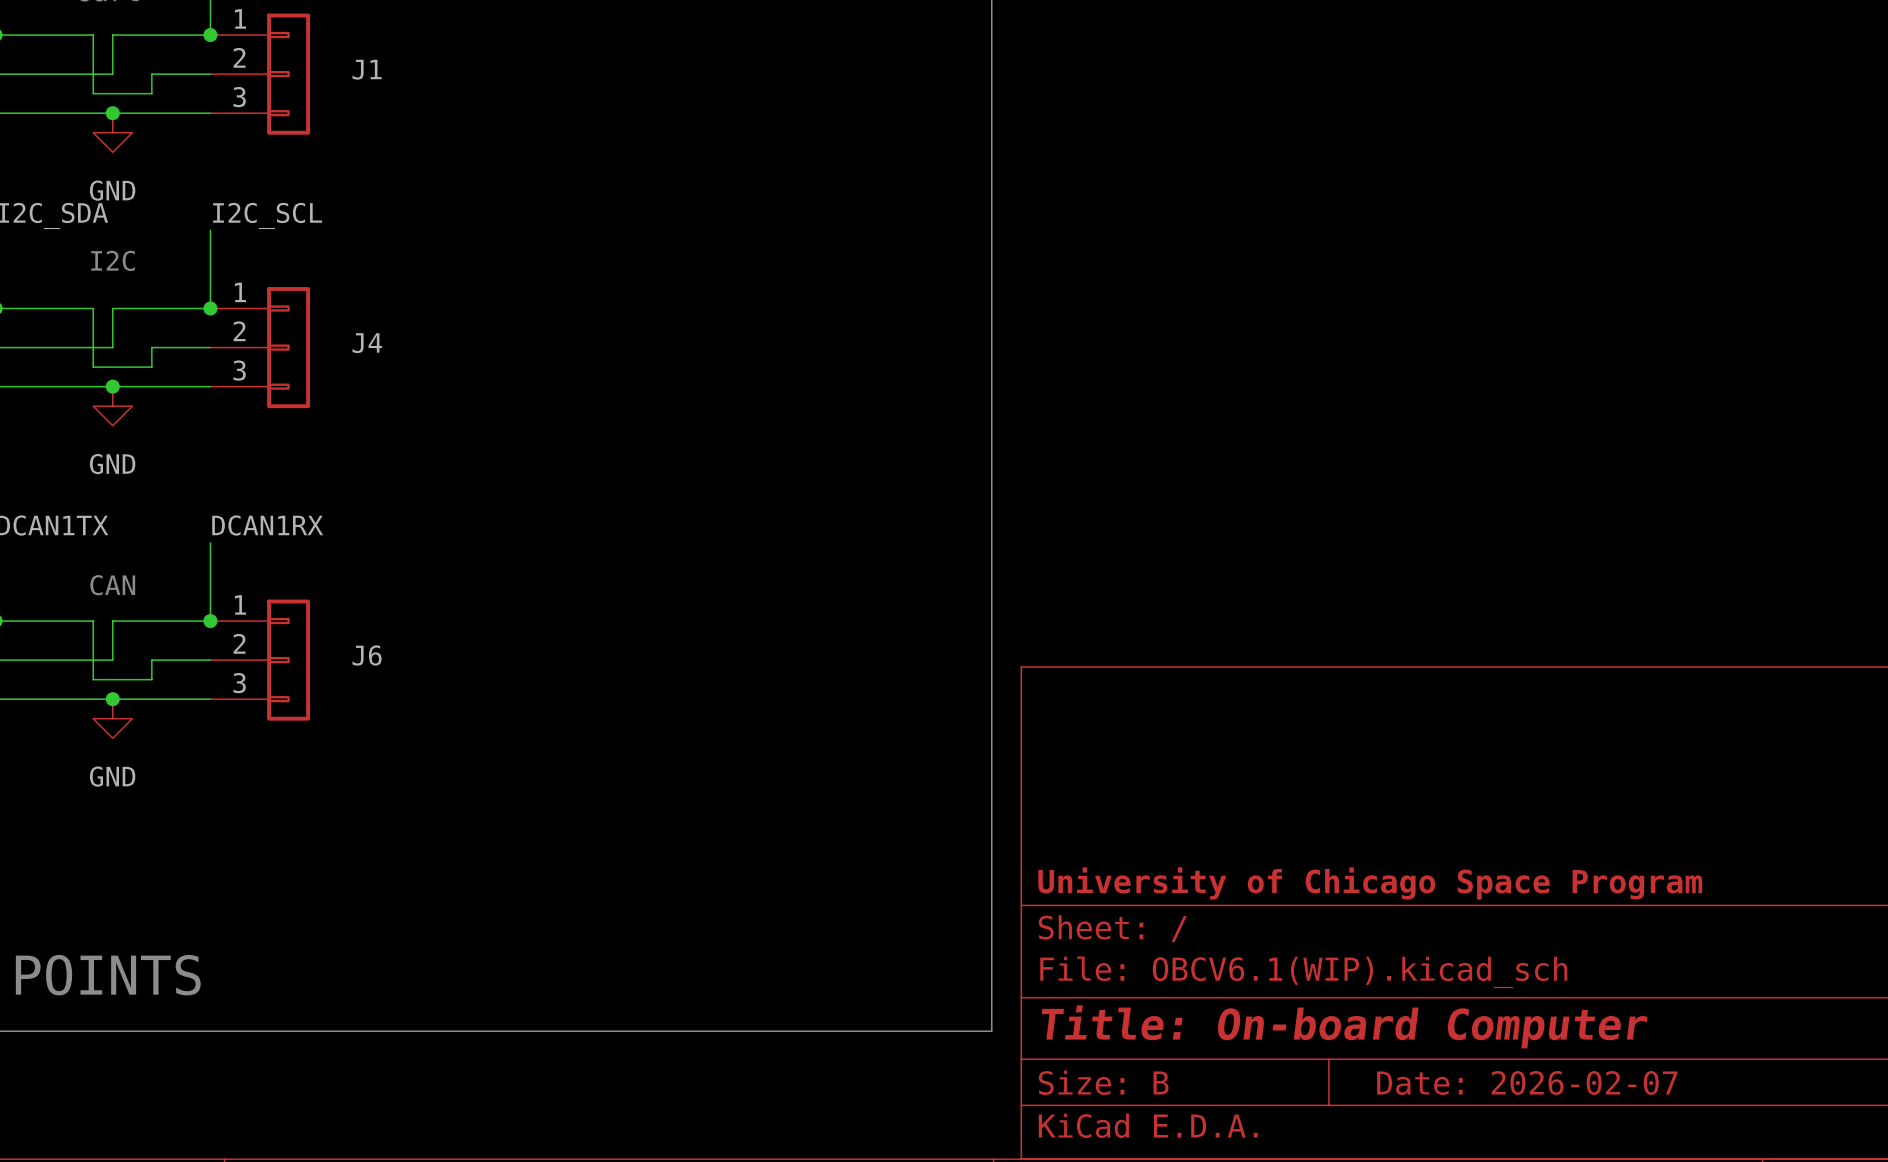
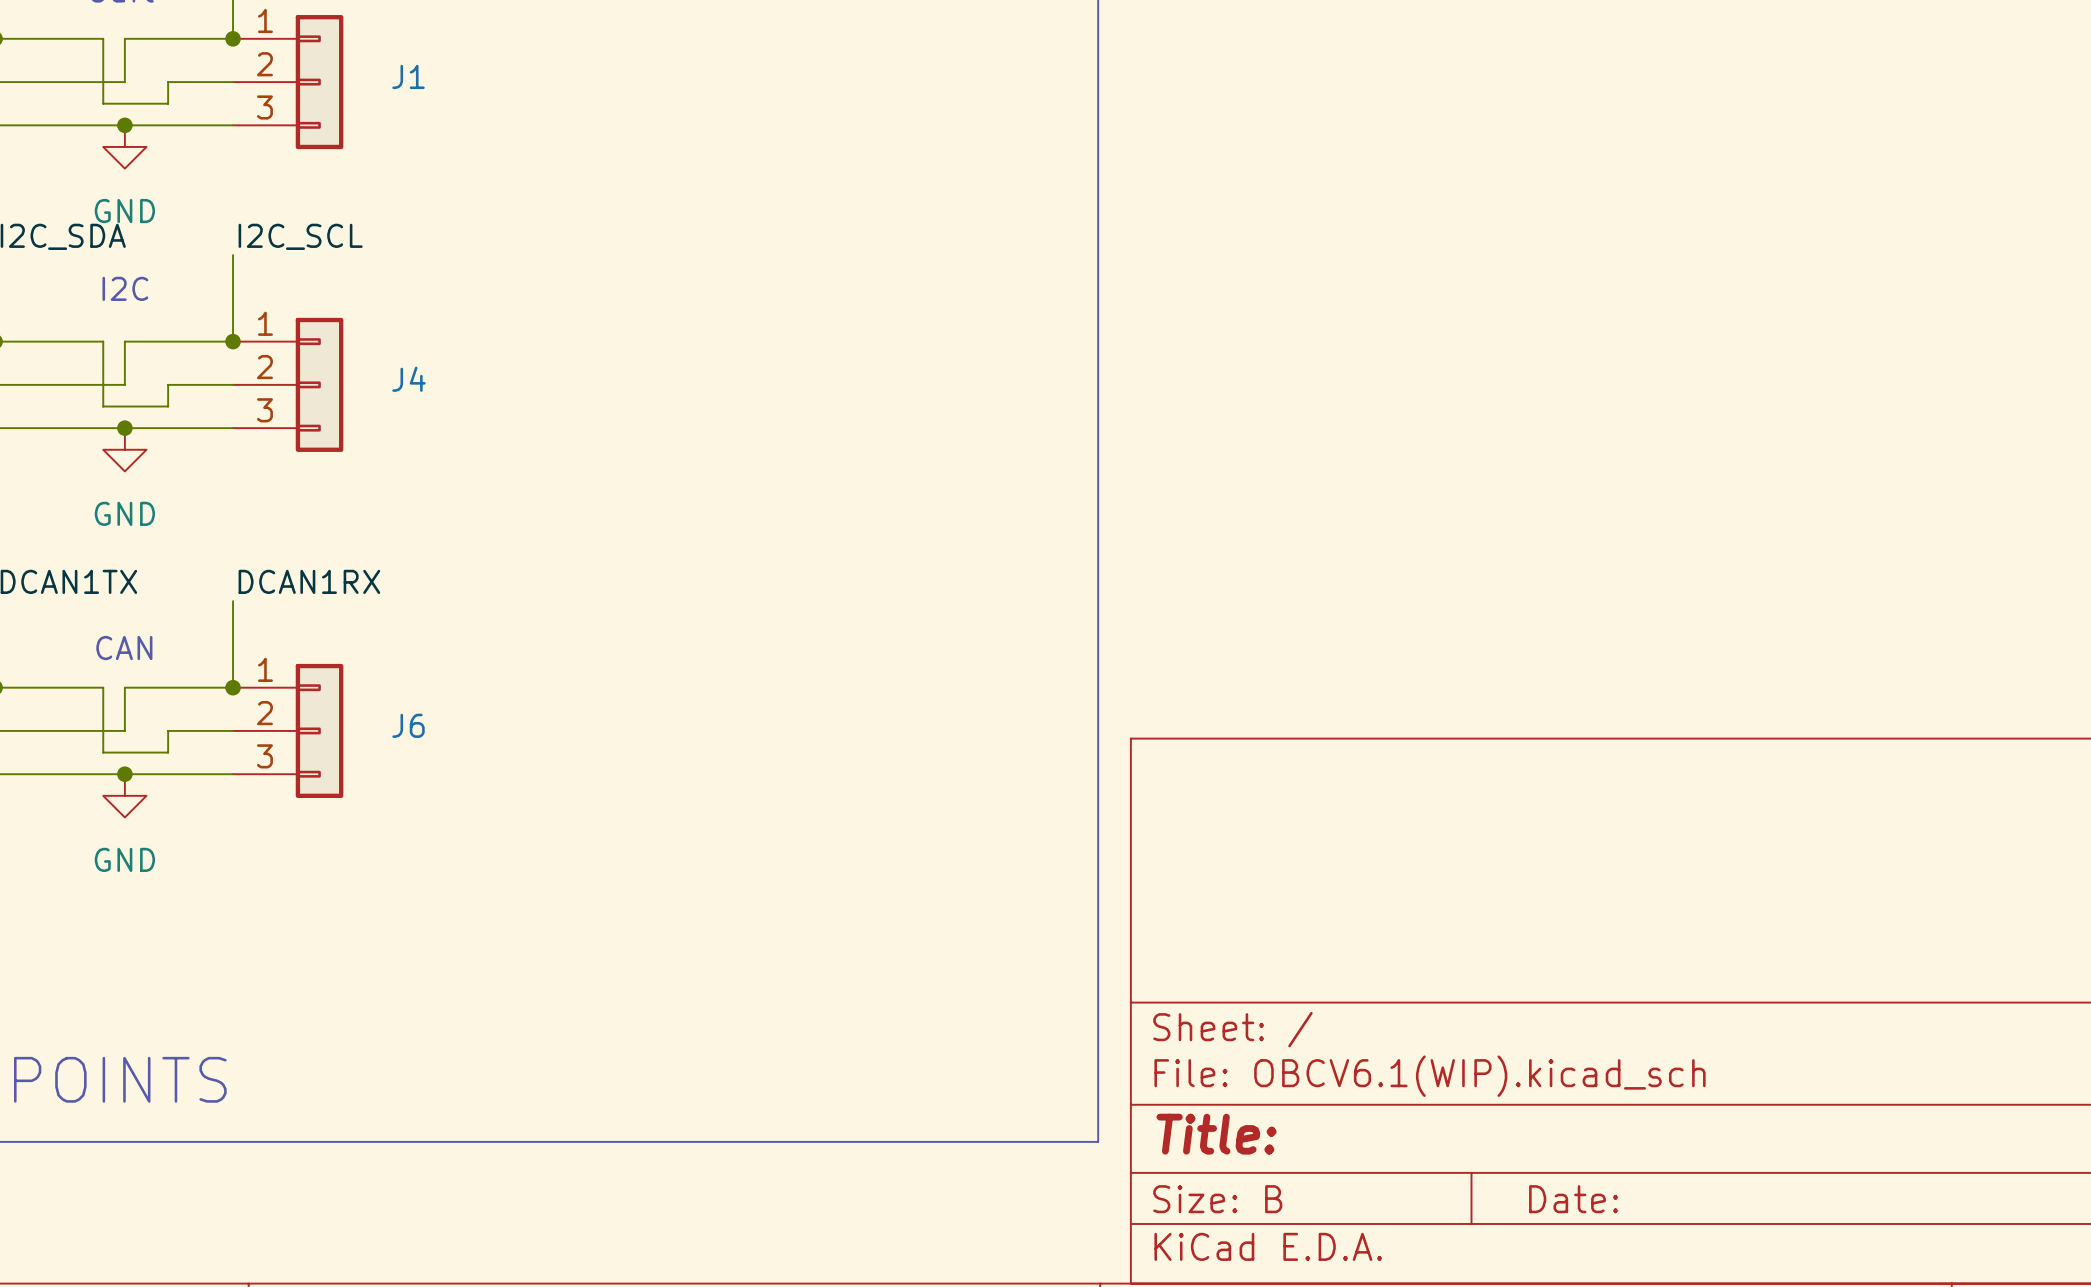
title block: University of Chicago Space Program (1370, 883) -> none
title block: Title: On-board Computer (1344, 1026) -> Title: (1216, 1134)
title block: Date: 2026-02-07 (1527, 1082) -> Date: (1573, 1199)

